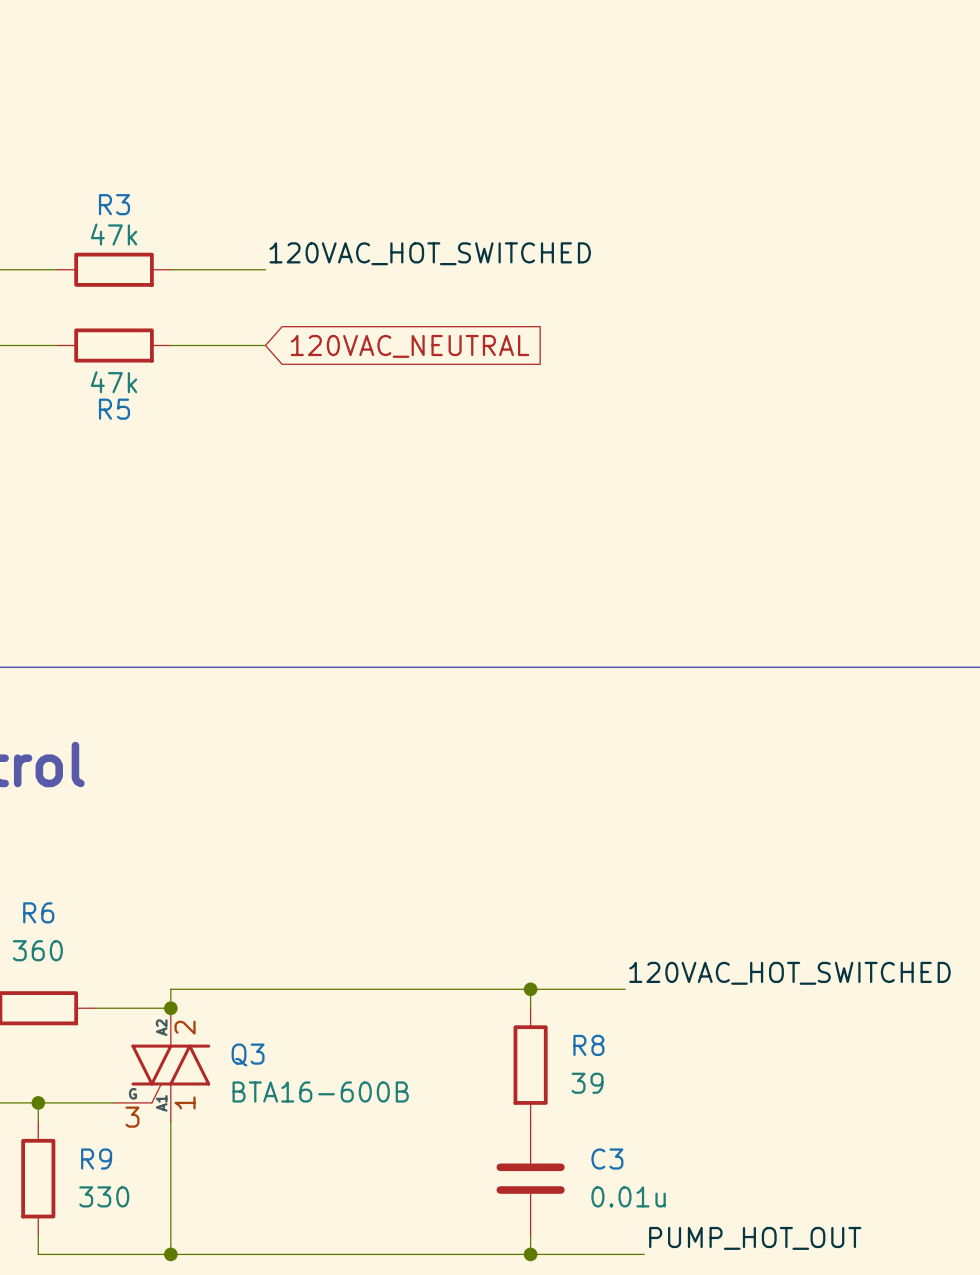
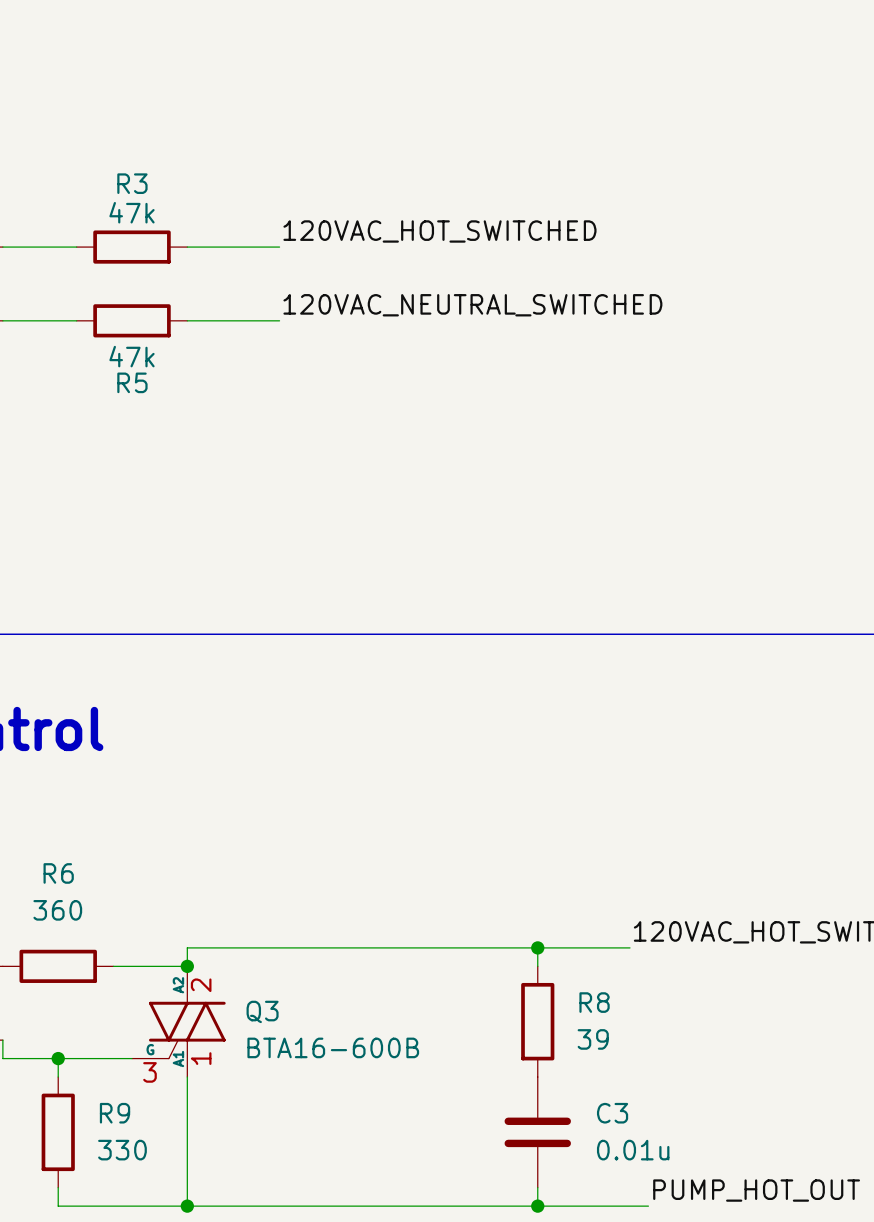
label: none -> 120VAC_NEUTRAL_SWITCHED (472, 305)
global label: 120VAC_NEUTRAL (410, 346) -> none

